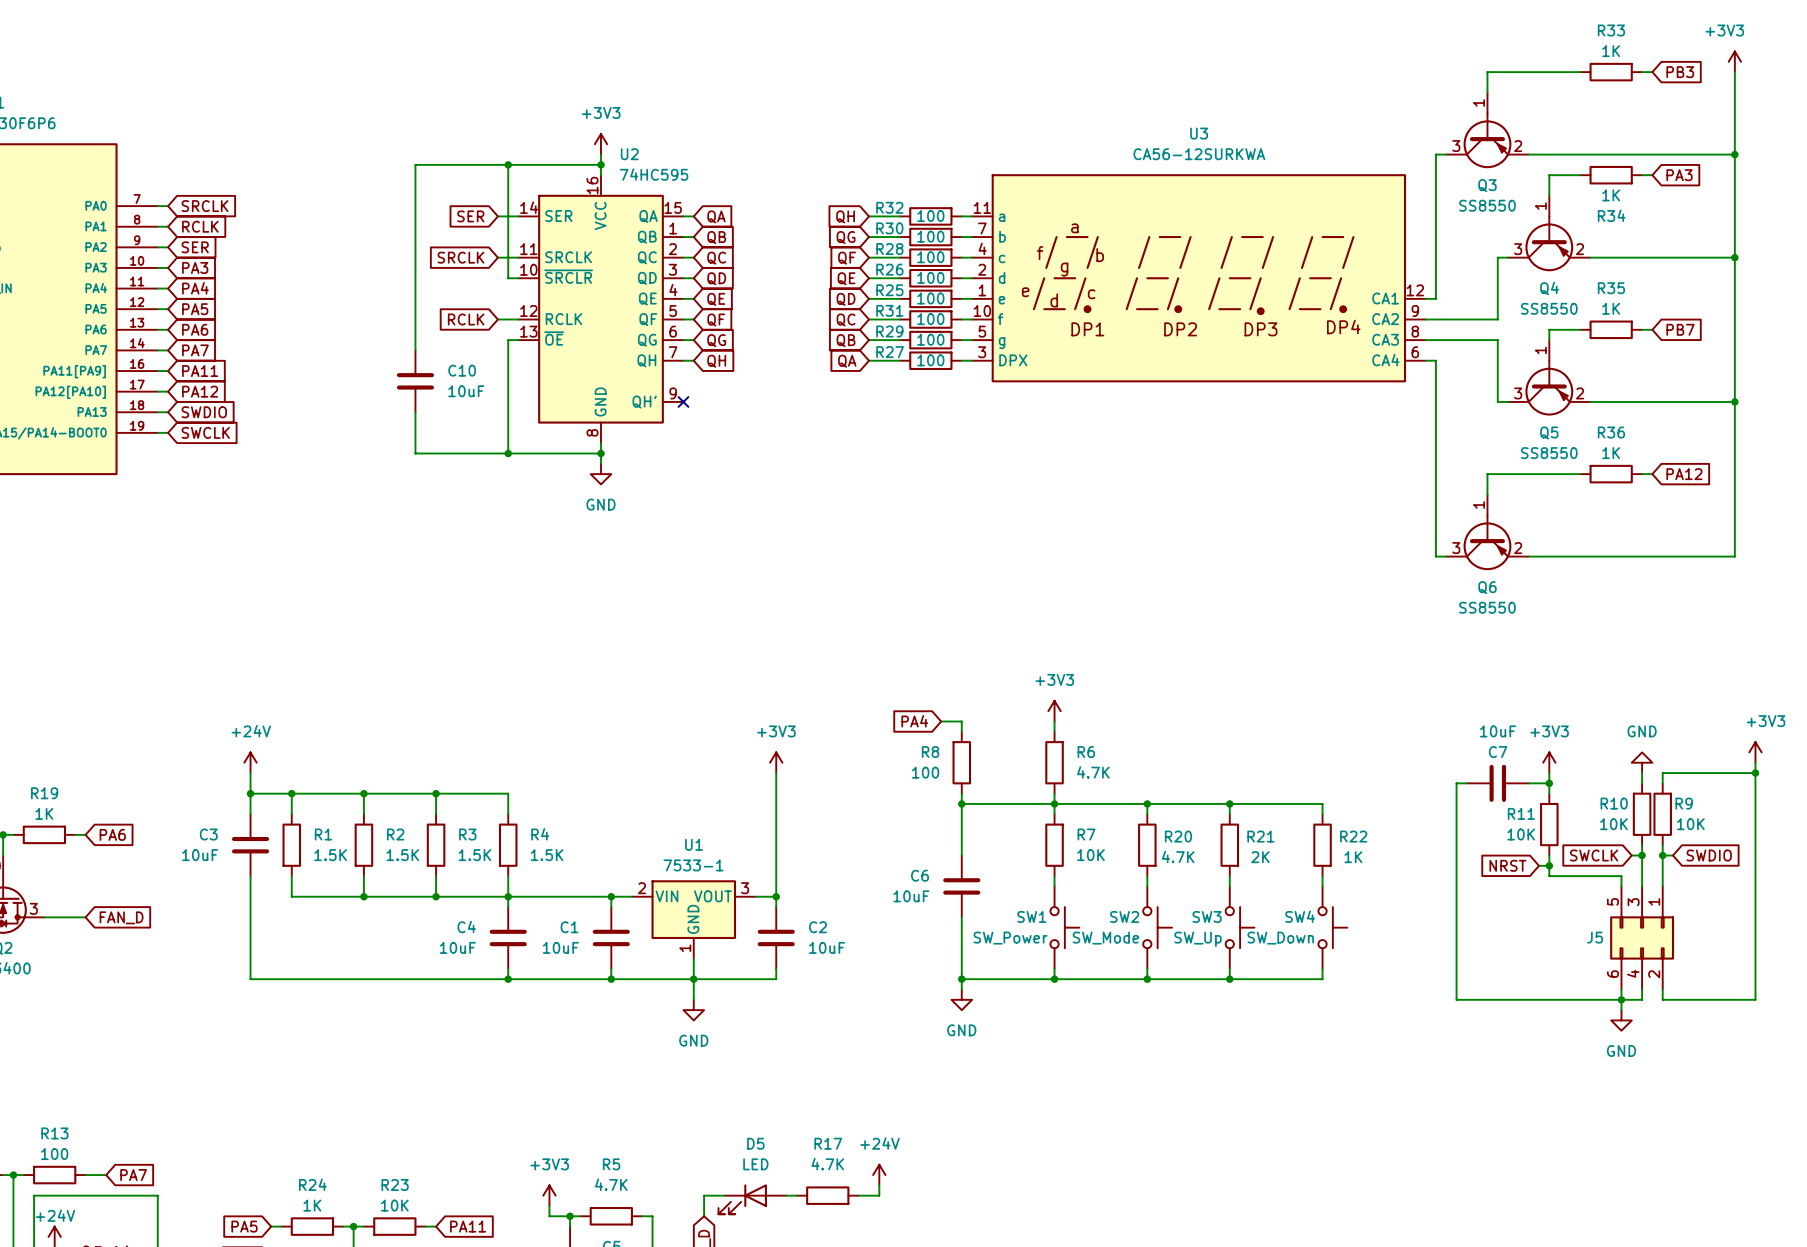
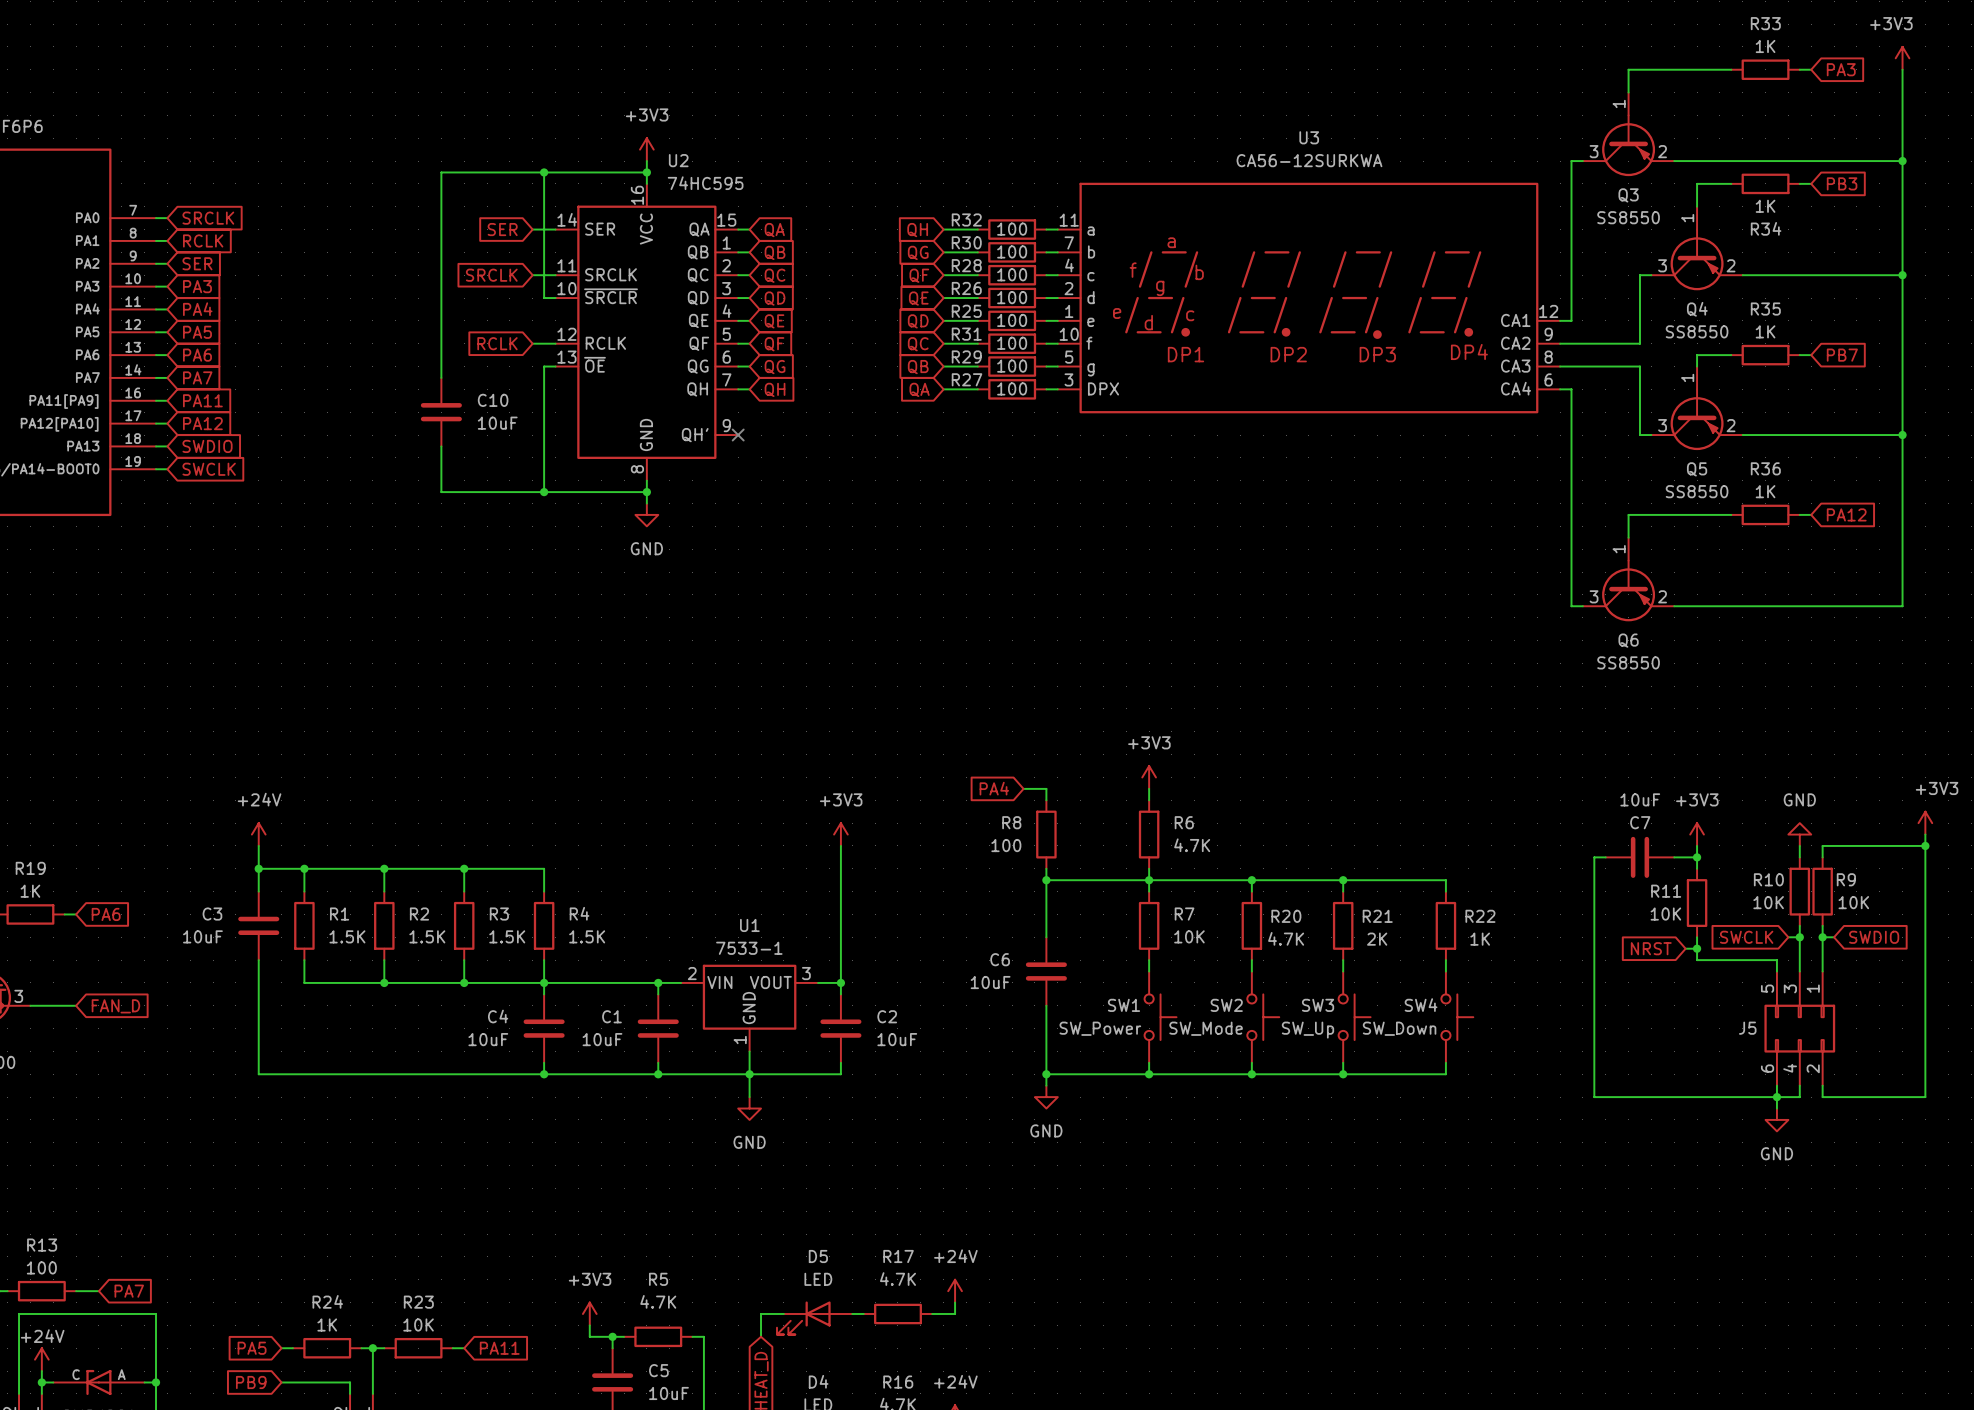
global label: PB3 (1680, 72) -> PA3 (1841, 69)
global label: PA3 (1679, 175) -> PB3 (1842, 183)

